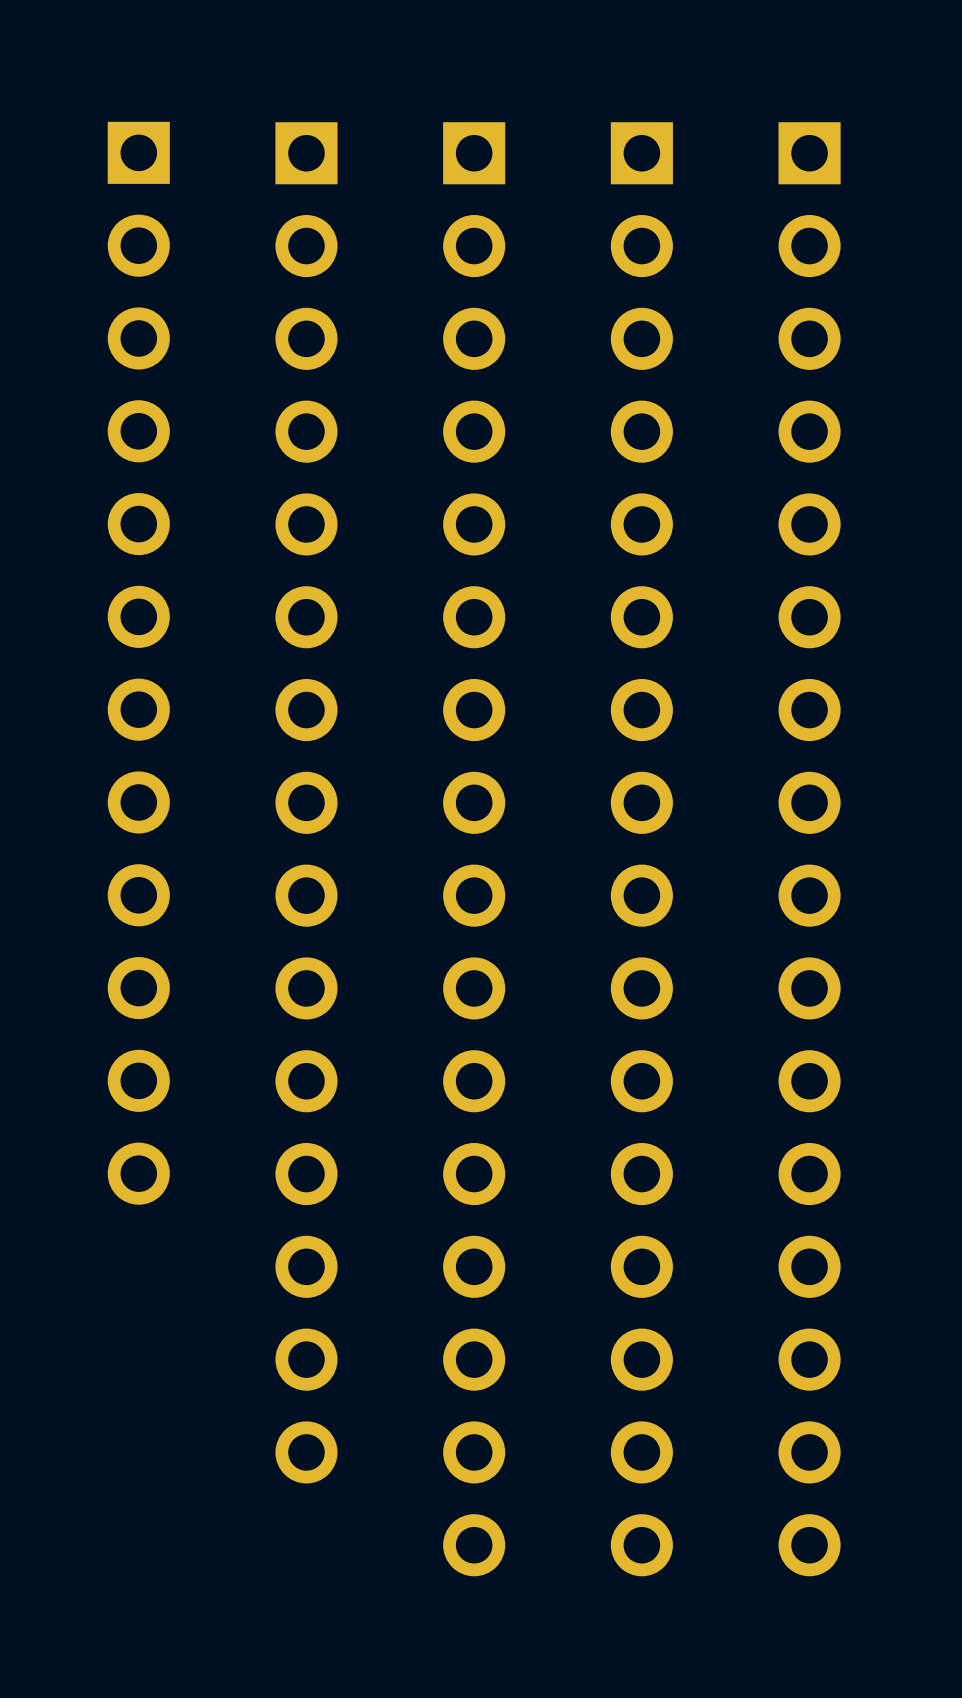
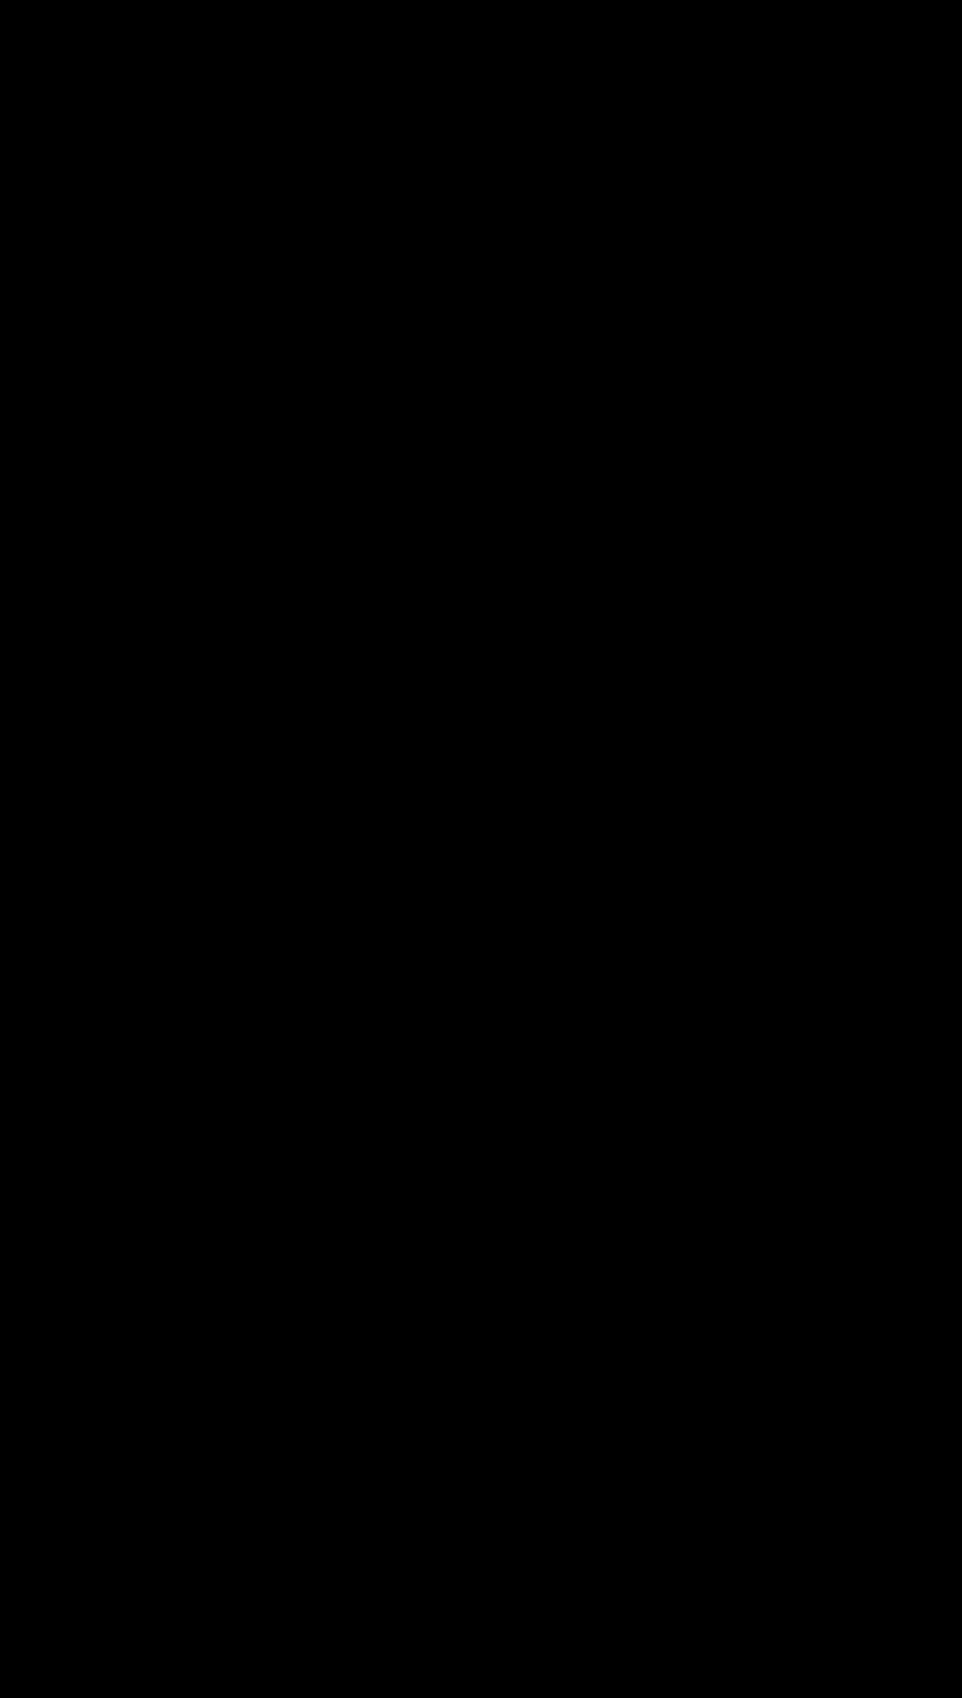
part: (138, 663) -> none
part: (306, 802) -> none
part: (474, 849) -> none
part: (641, 849) -> none
part: (809, 849) -> none

